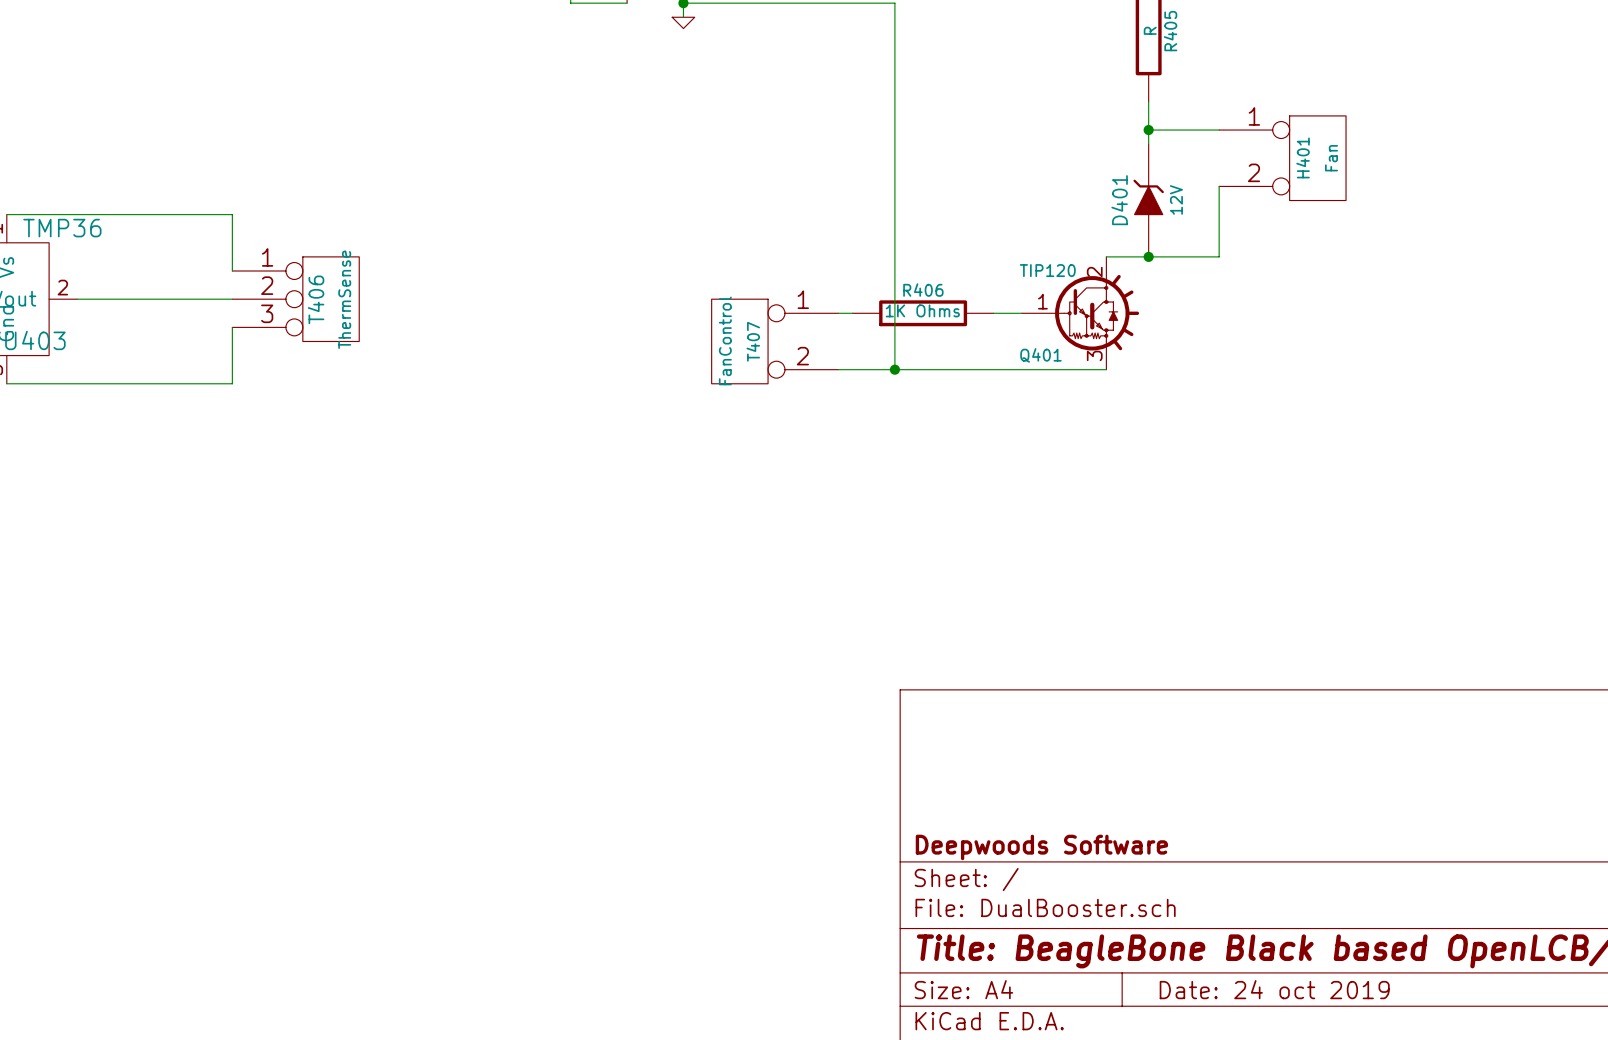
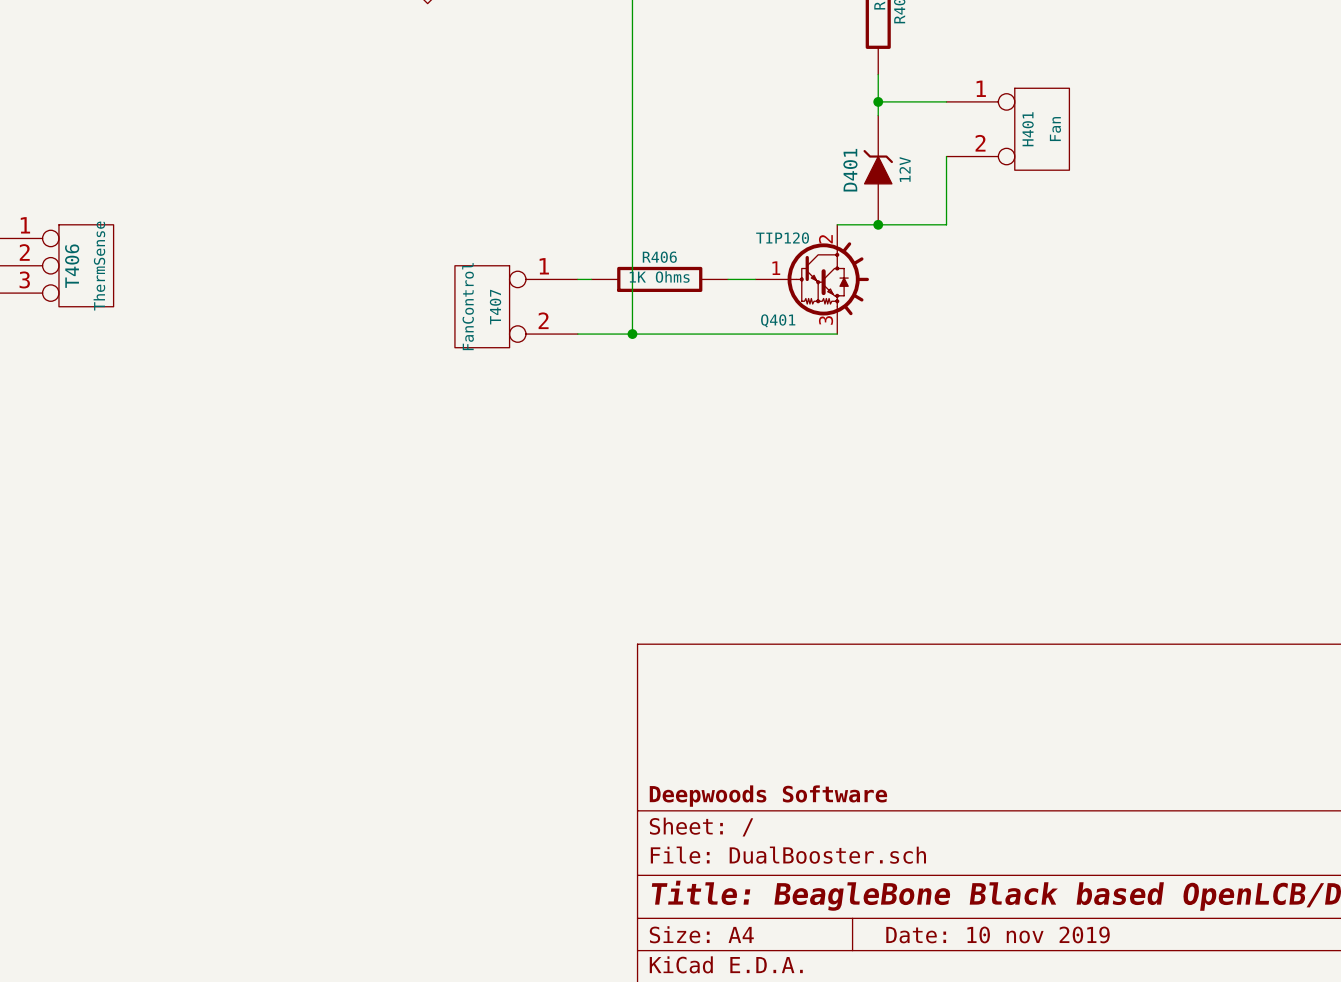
title block: Date: 24 oct 2019 (1274, 989) -> Date: 10 nov 2019 (998, 934)

